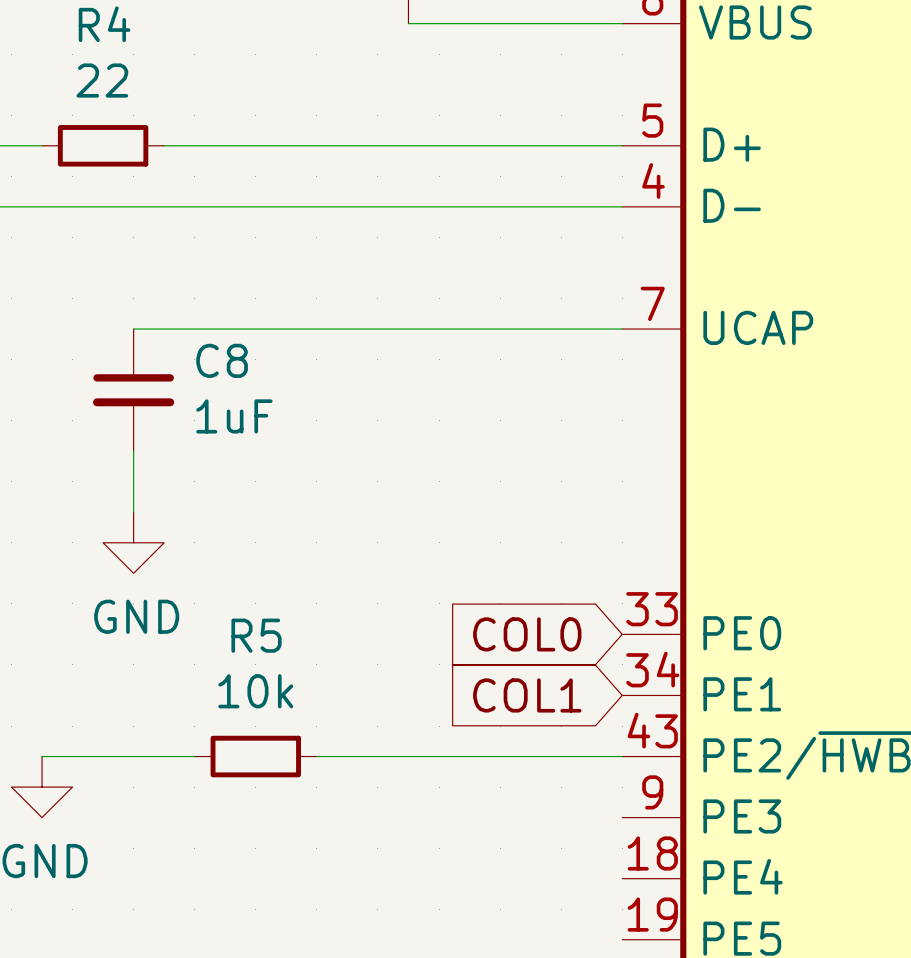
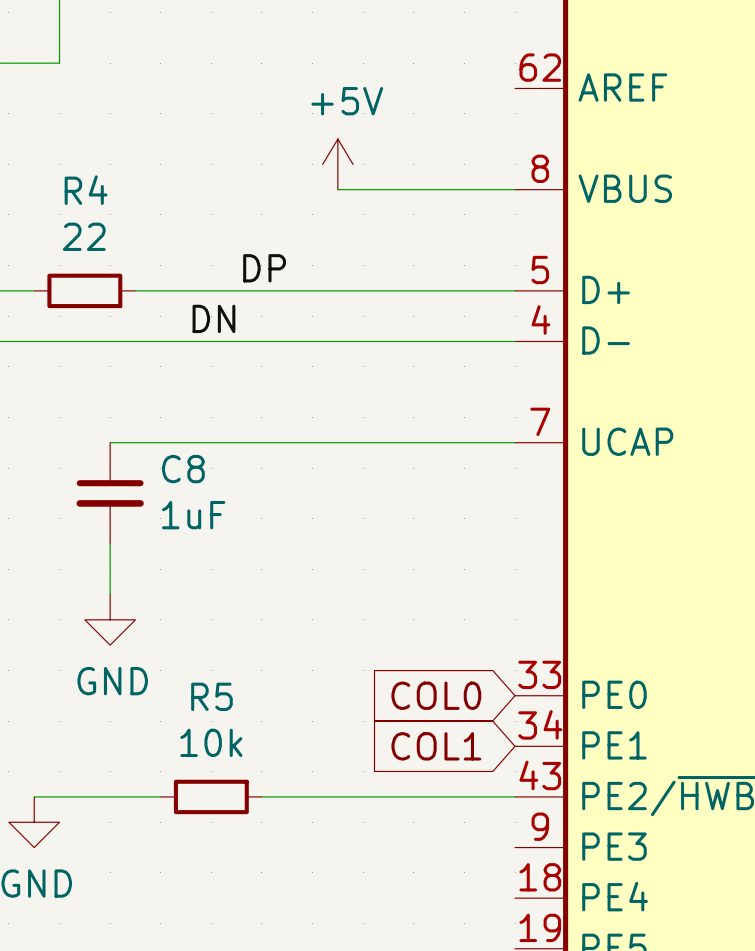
label: none -> DP (264, 268)
label: none -> DN (213, 318)

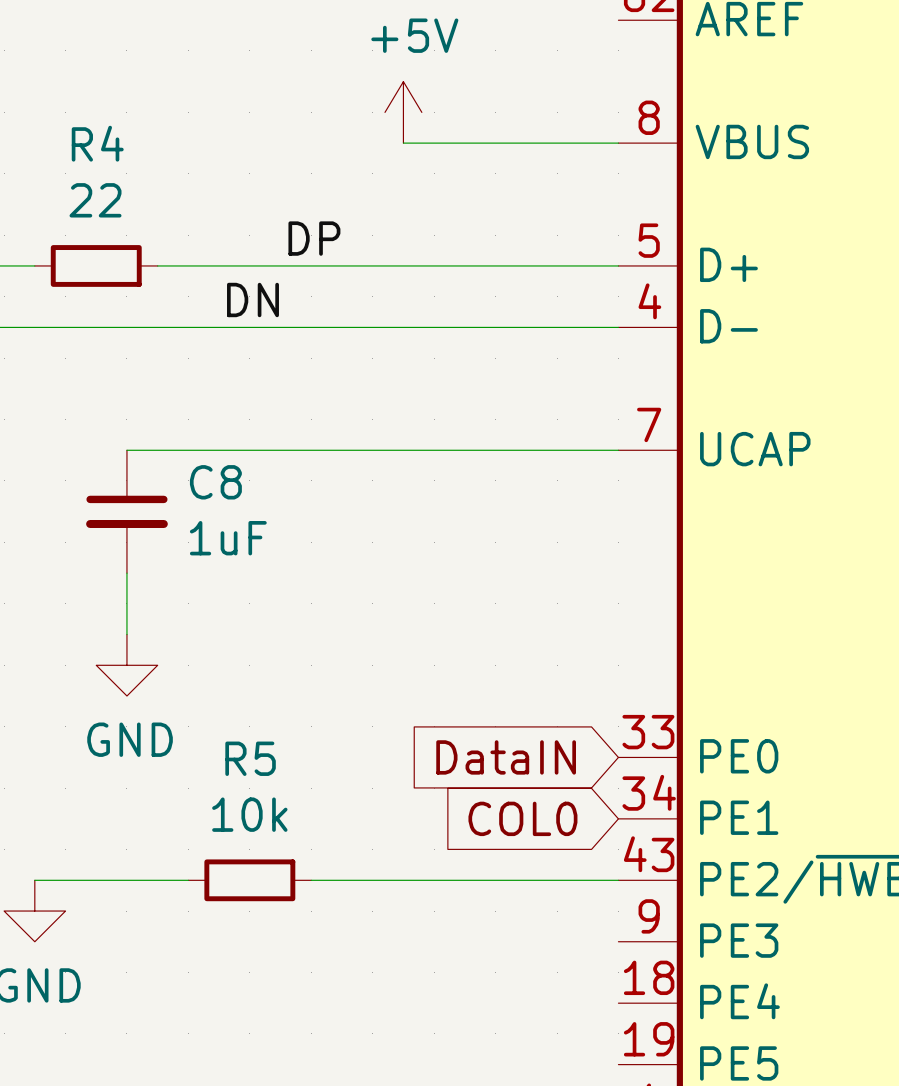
global label: COL0 (436, 695) -> DataIN (506, 757)
global label: COL1 (436, 746) -> COL0 (522, 818)

